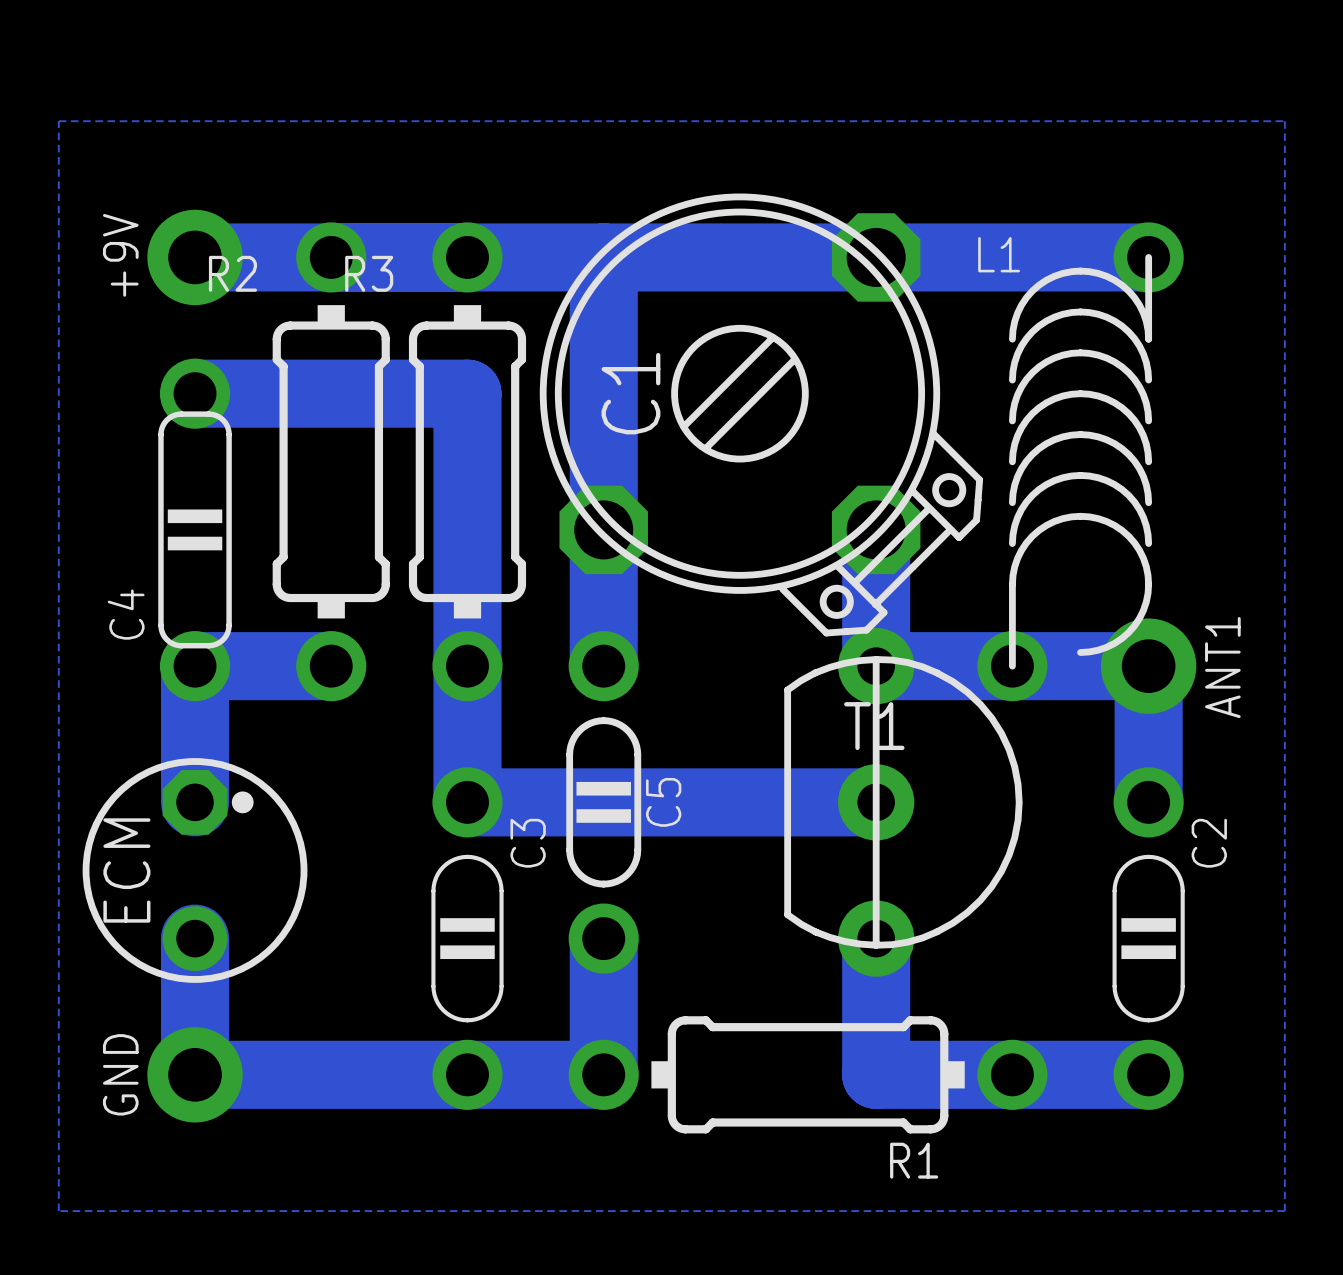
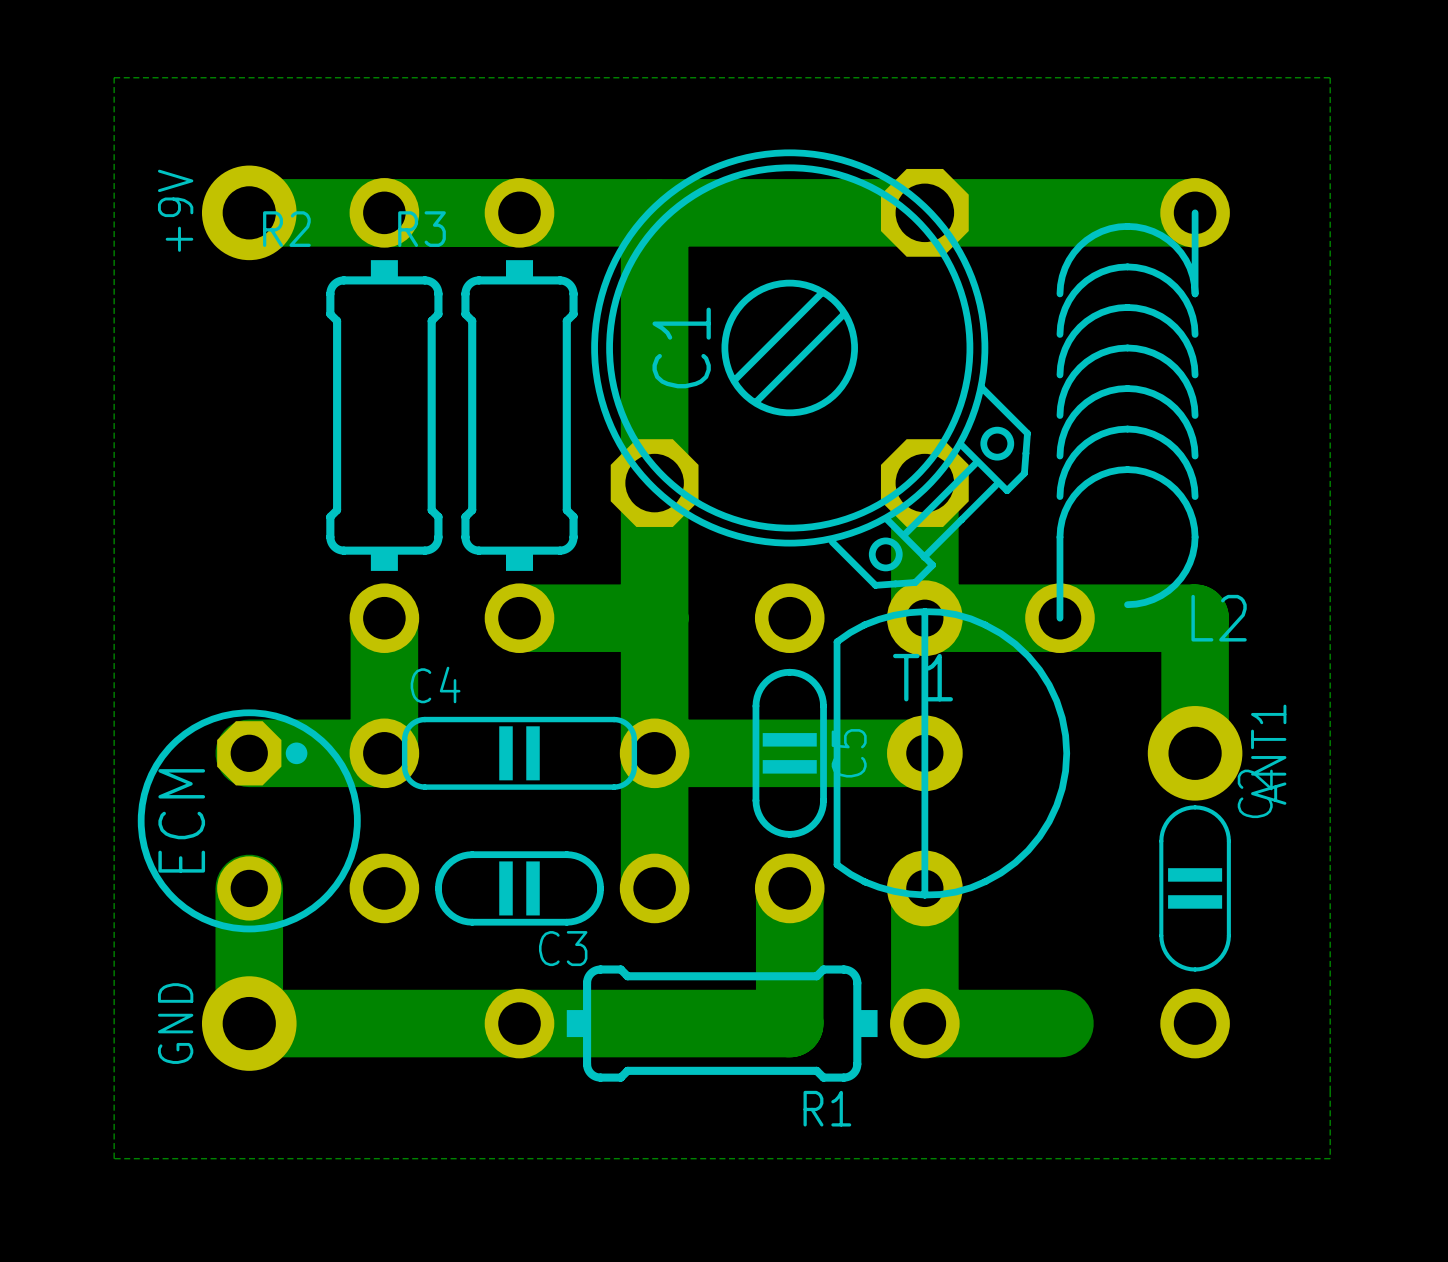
L1 name: L1 (999, 254) -> L2 (1219, 618)
bottom track: (195, 393) (467, 393) (467, 802) (603, 802) -> none
C4 rotation: 0° (195, 529) -> 90° clockwise (519, 753)
C4 position: (195, 529) -> (519, 753)
bottom track: (331, 666) (195, 666) (195, 802) -> (384, 618) (384, 753) (249, 753)
bottom track: none -> (519, 618) (654, 618) (654, 888)
ANT1 position: (1148, 666) -> (1195, 753)
C3 footprint: [431, 767, 504, 1110] -> [349, 851, 690, 926]
C5 position: (603, 802) -> (789, 753)
C3 name position: C3 (528, 843) -> C3 (563, 948)
bottom track: (603, 938) (603, 1074) -> (789, 888) (789, 1023) (654, 1023)
R1 position: (808, 1074) -> (722, 1023)
bottom track: (1012, 1074) (1148, 1074) -> none

